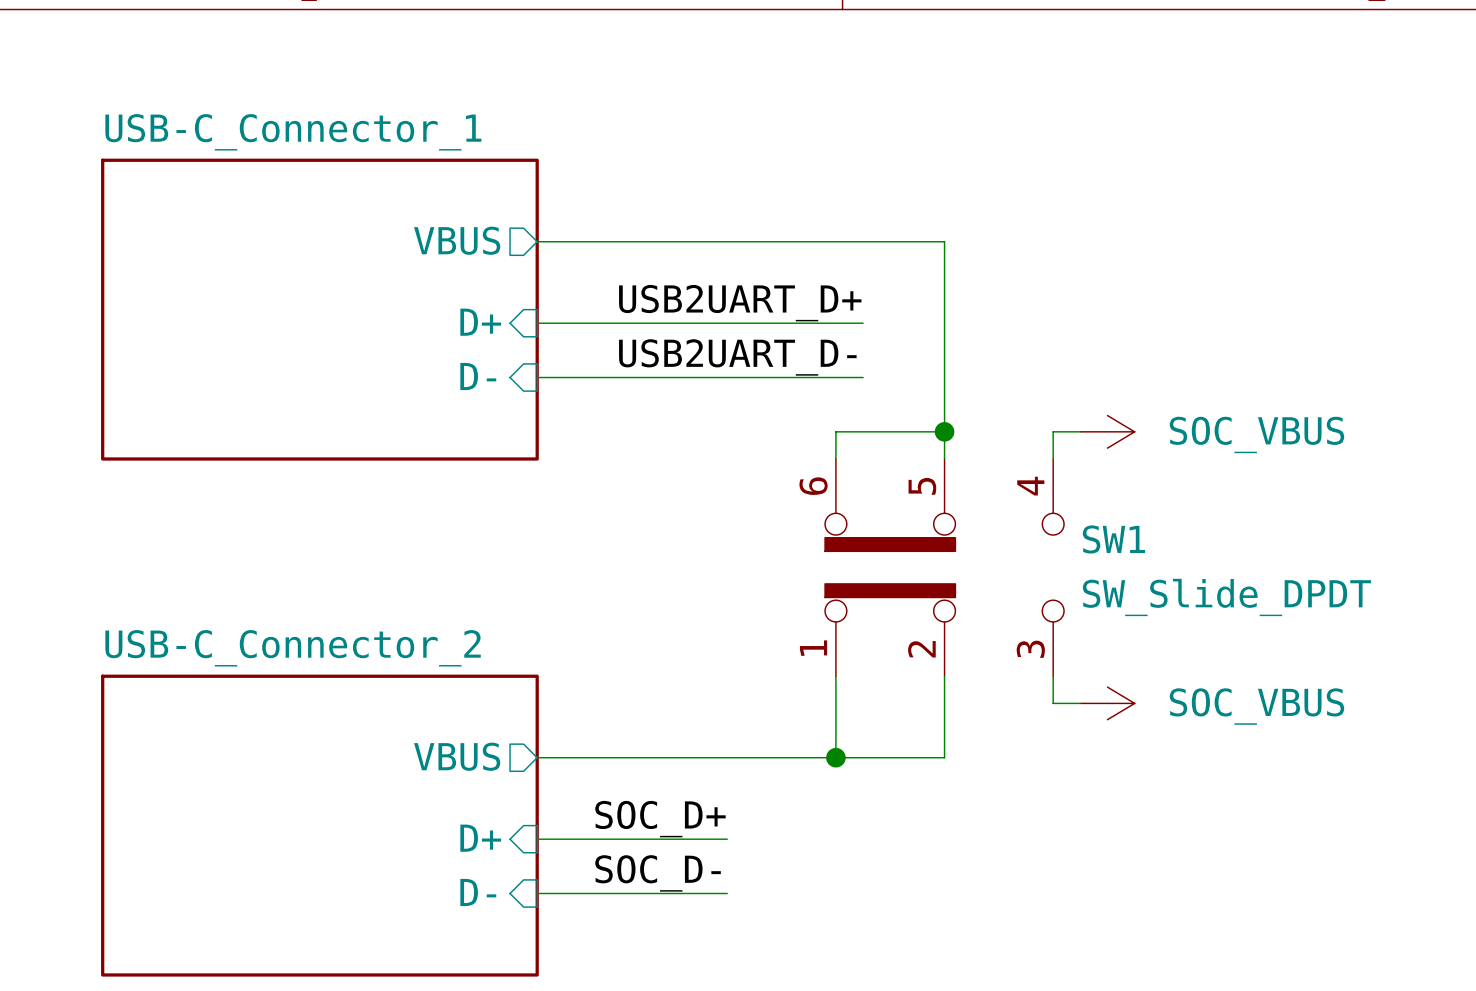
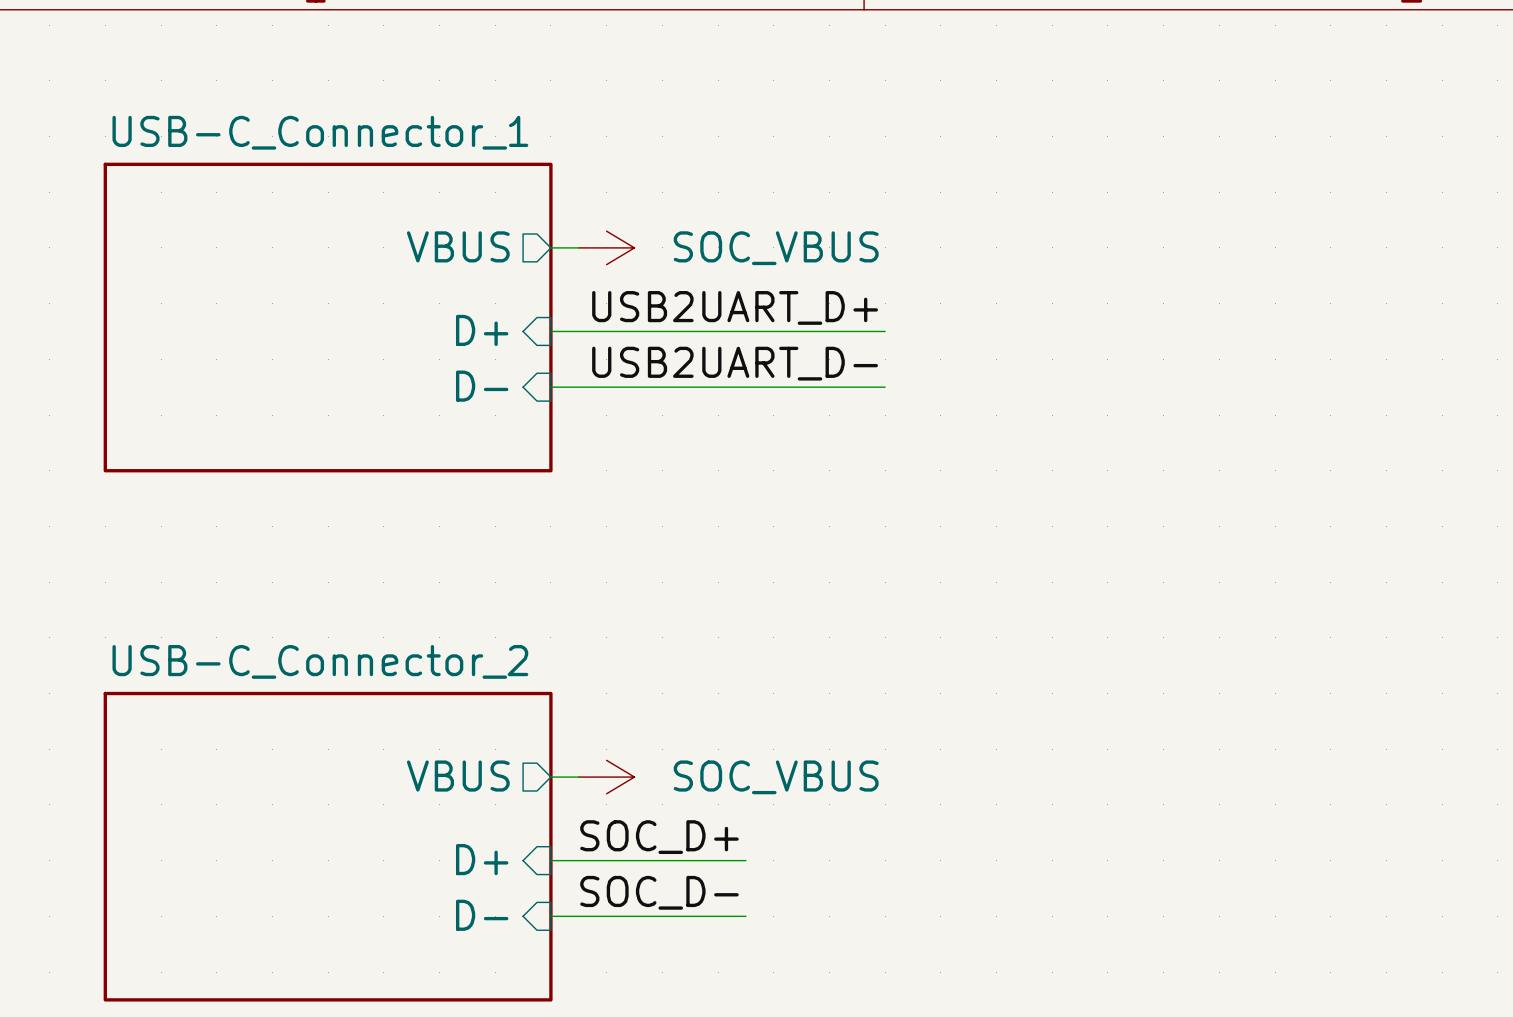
wire: (564, 241) (944, 241) (944, 458) -> none
power symbol: none -> SOC_VBUS (606, 247)
wire: (944, 431) (835, 431) (835, 458) -> none
junction: (944, 431) -> none
wire: (1080, 431) (1053, 431) (1053, 458) -> none
power symbol: SOC_VBUS (1107, 431) -> none
SW1: SW_Slide_DPDT (944, 567) -> none
wire: (835, 676) (835, 757) -> none
wire: (944, 676) (944, 757) (564, 757) -> none
wire: (1053, 676) (1053, 703) (1080, 703) -> none
power symbol: SOC_VBUS (1107, 703) -> none
power symbol: none -> SOC_VBUS (606, 777)
junction: (835, 757) -> none

